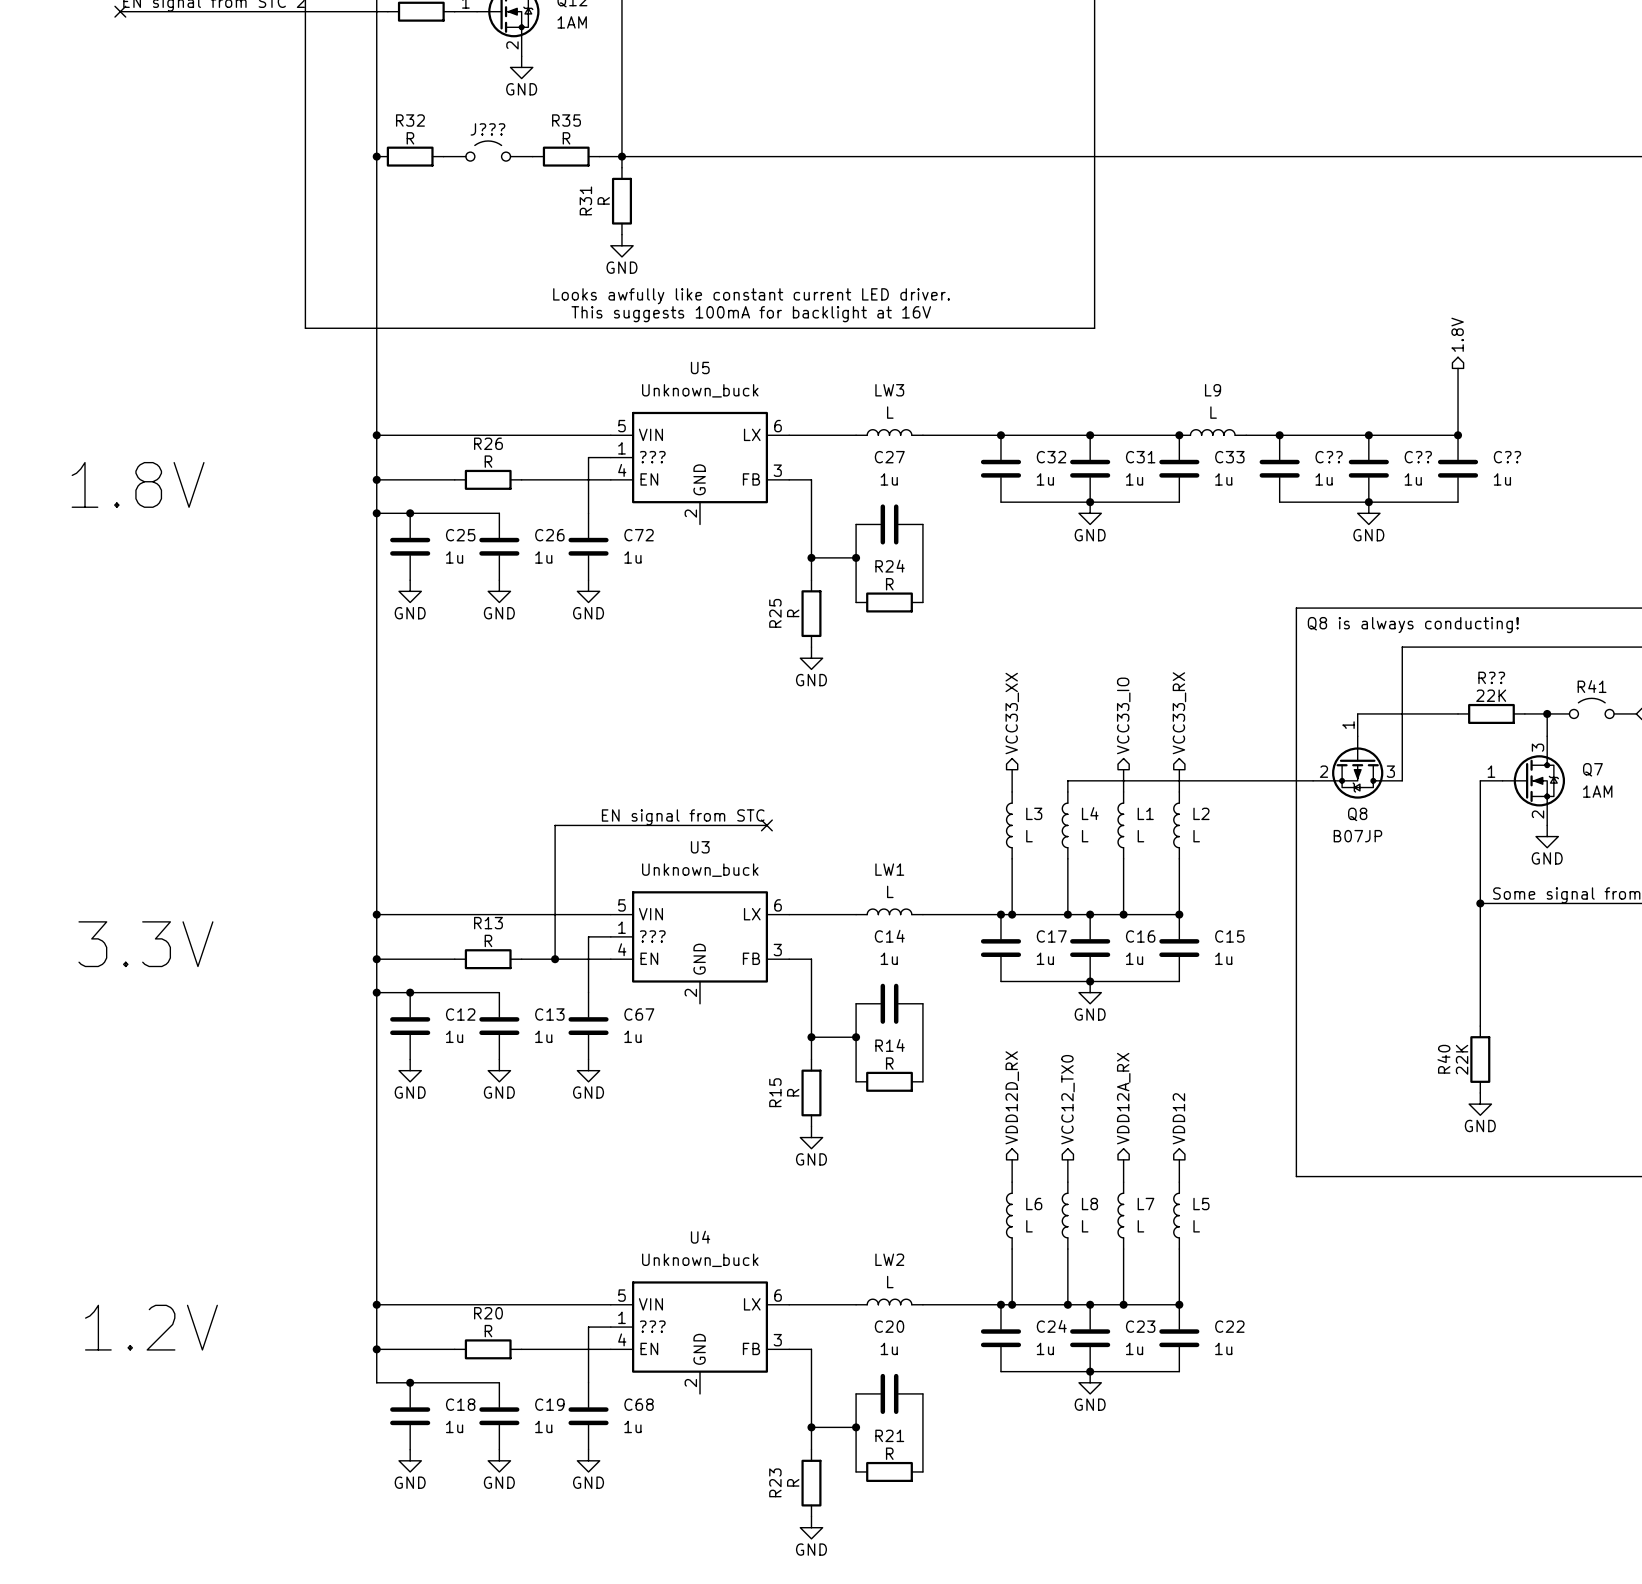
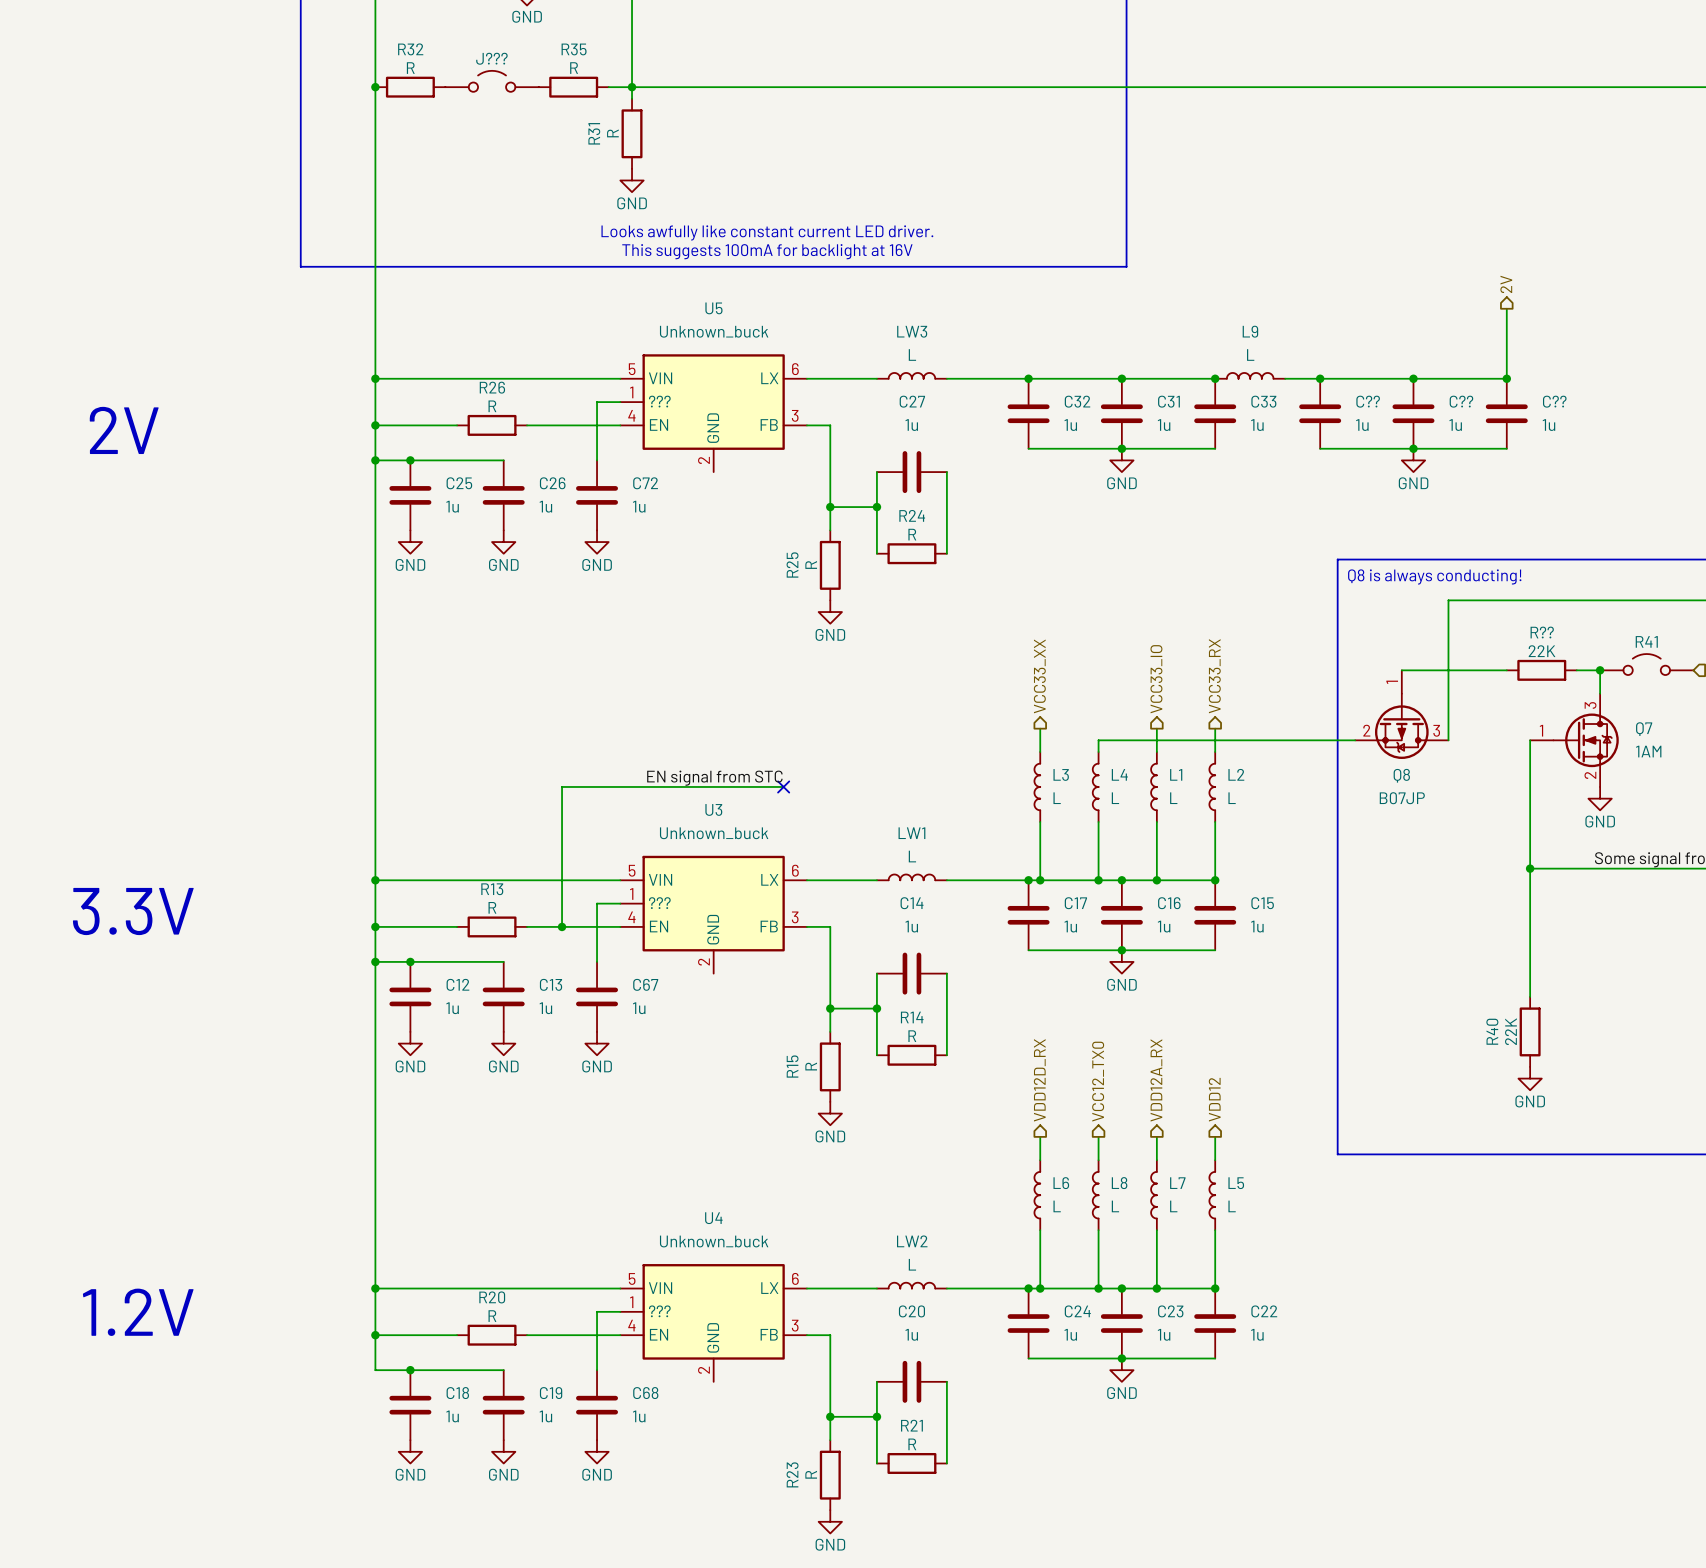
hierarchical label: 1.8V (1457, 334) -> 2V (1506, 284)
text: 1.8V (138, 484) -> 2V (124, 430)

